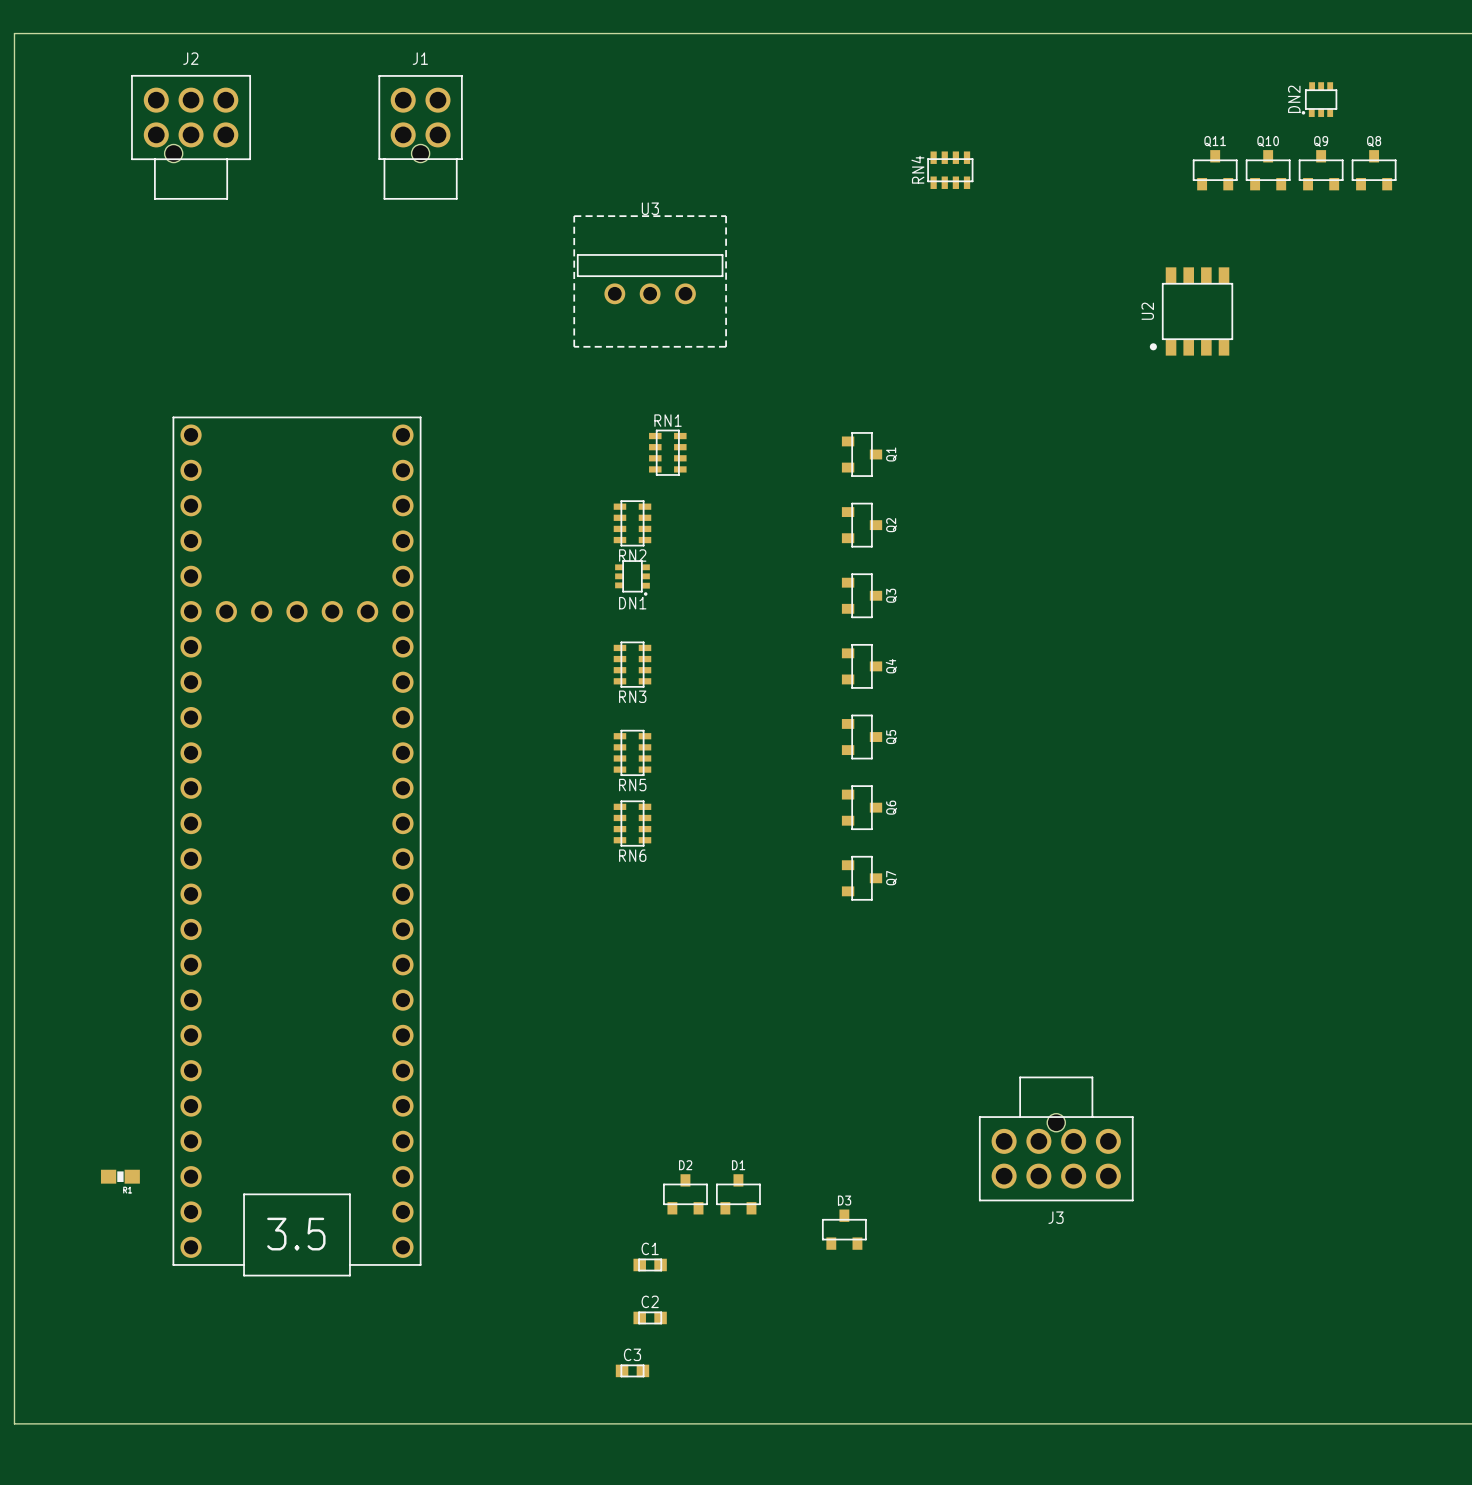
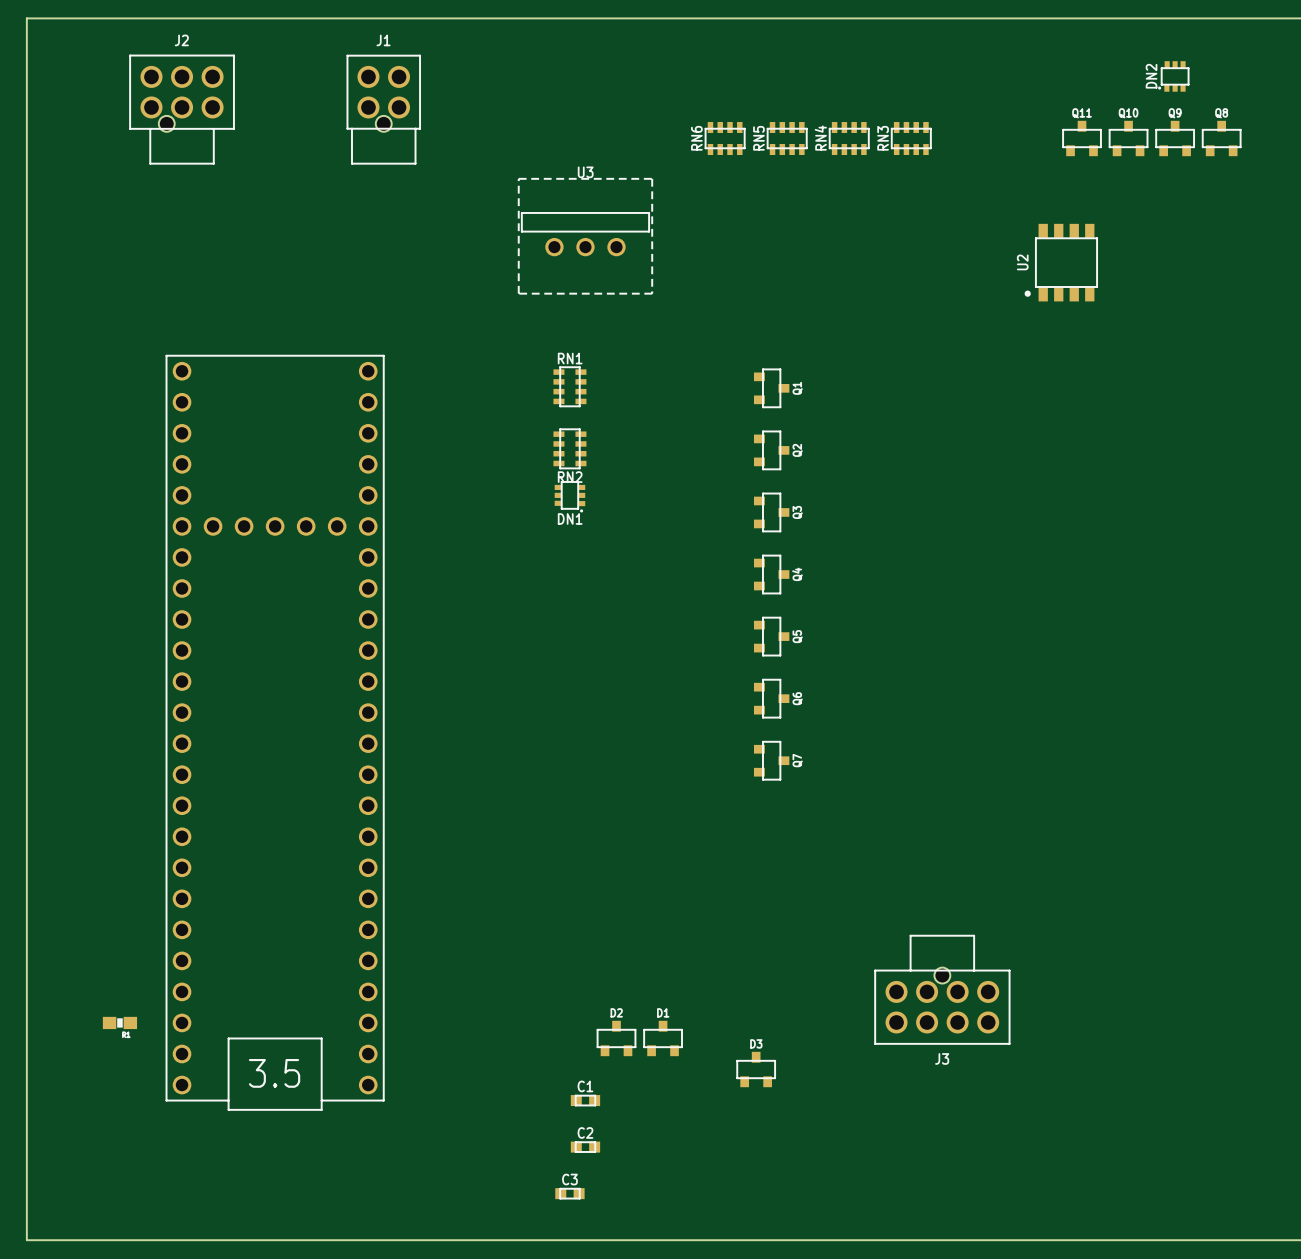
RN1 position: (667, 452) -> (569, 386)
RN3 rotation: 0° (632, 664) -> 90° clockwise (911, 138)
RN3 position: (632, 664) -> (911, 138)
RN5 rotation: 0° (632, 752) -> 90° clockwise (787, 138)
RN5 position: (632, 752) -> (787, 138)
RN6 rotation: 0° (632, 823) -> 90° clockwise (725, 138)
RN6 position: (632, 823) -> (725, 138)

